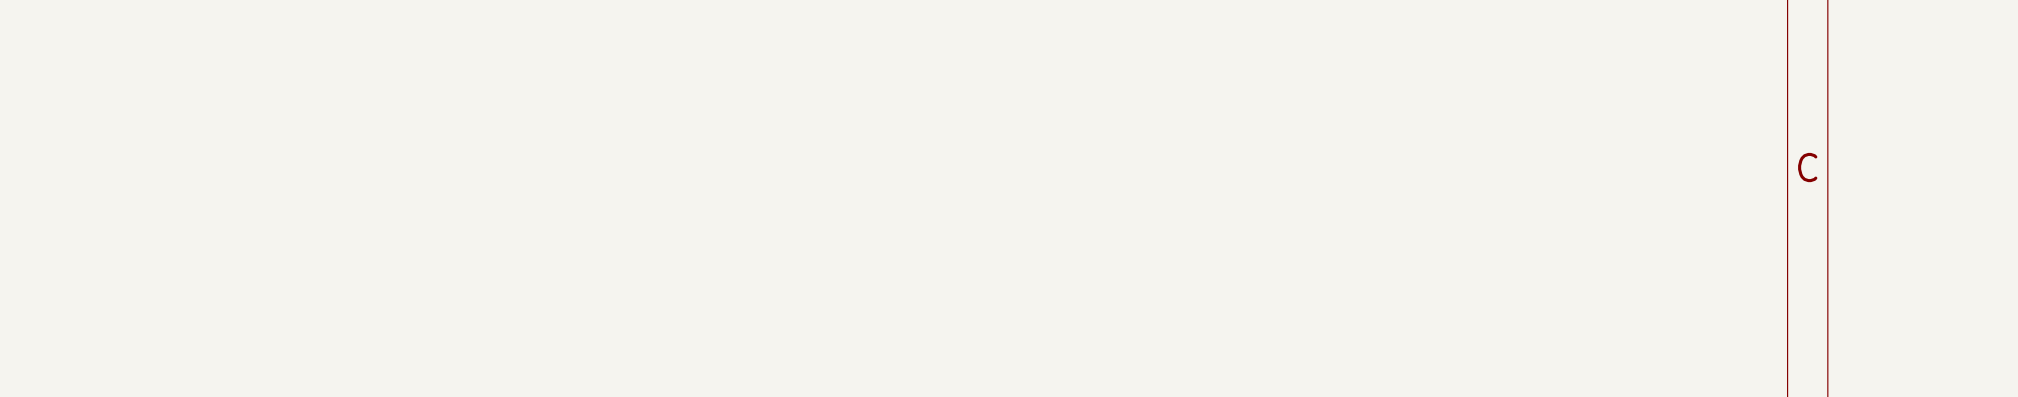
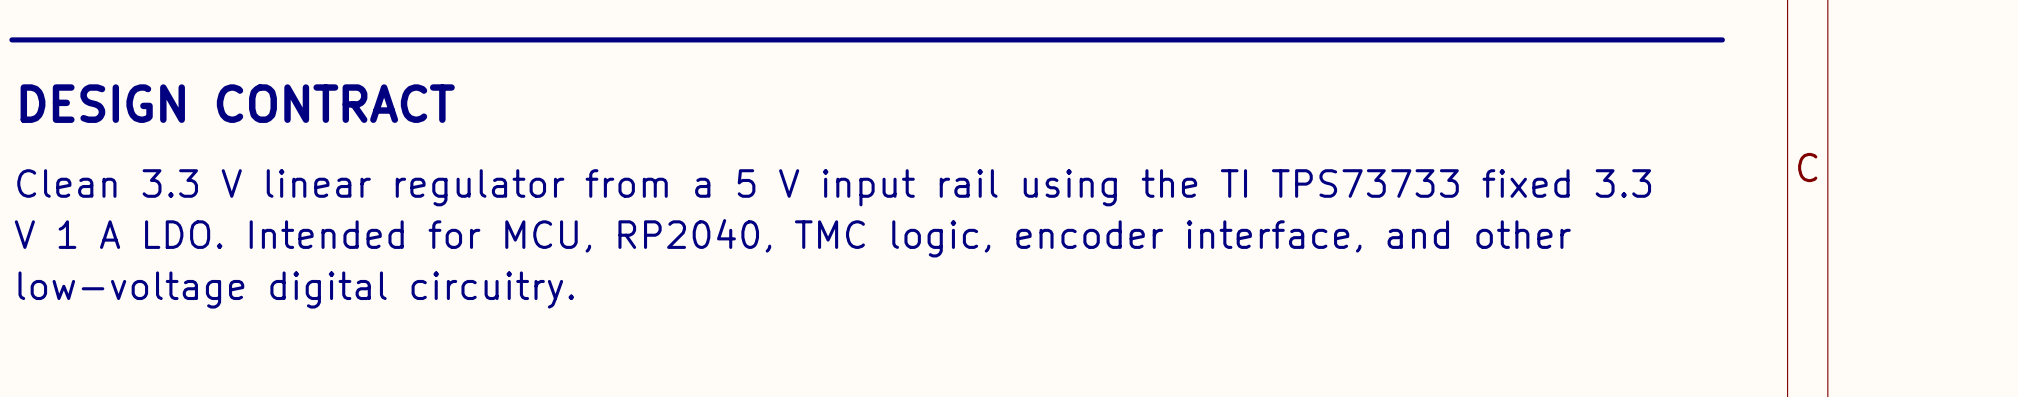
line: none -> (11, 39) (1722, 39)
text: none -> DESIGN CONTRACT (237, 103)
text: none -> Clean 3.3 V linear regulator from a 5 V input rail using the TI TPS73733 fixed 3.3 (834, 187)
text: none -> V 1 A LDO. Intended for MCU, RP2040, TMC logic, encoder interface, and other (792, 238)
text: none -> low-voltage digital circuitry. (296, 289)

